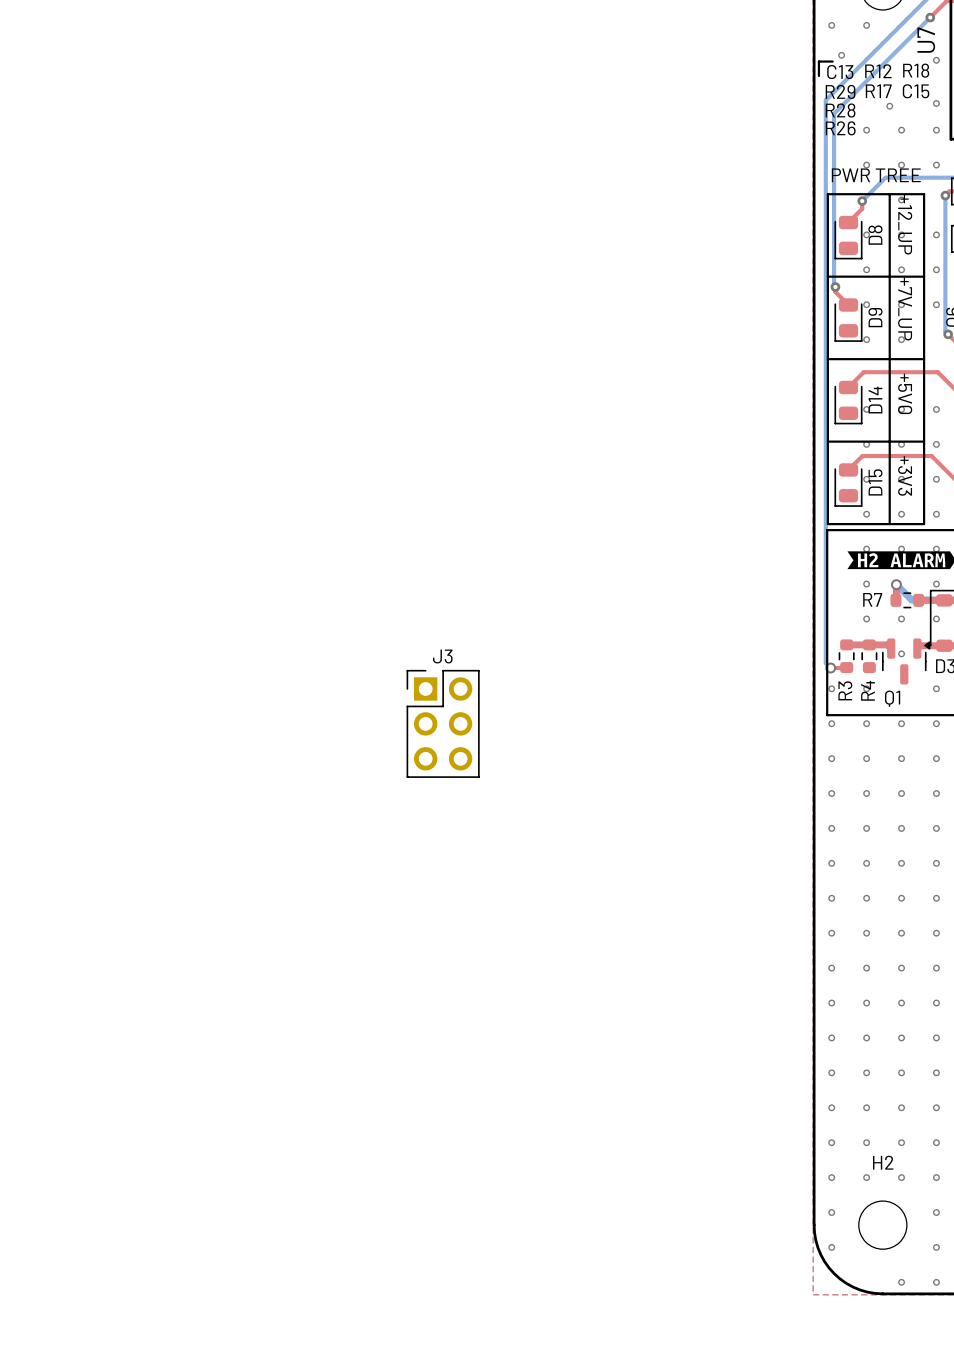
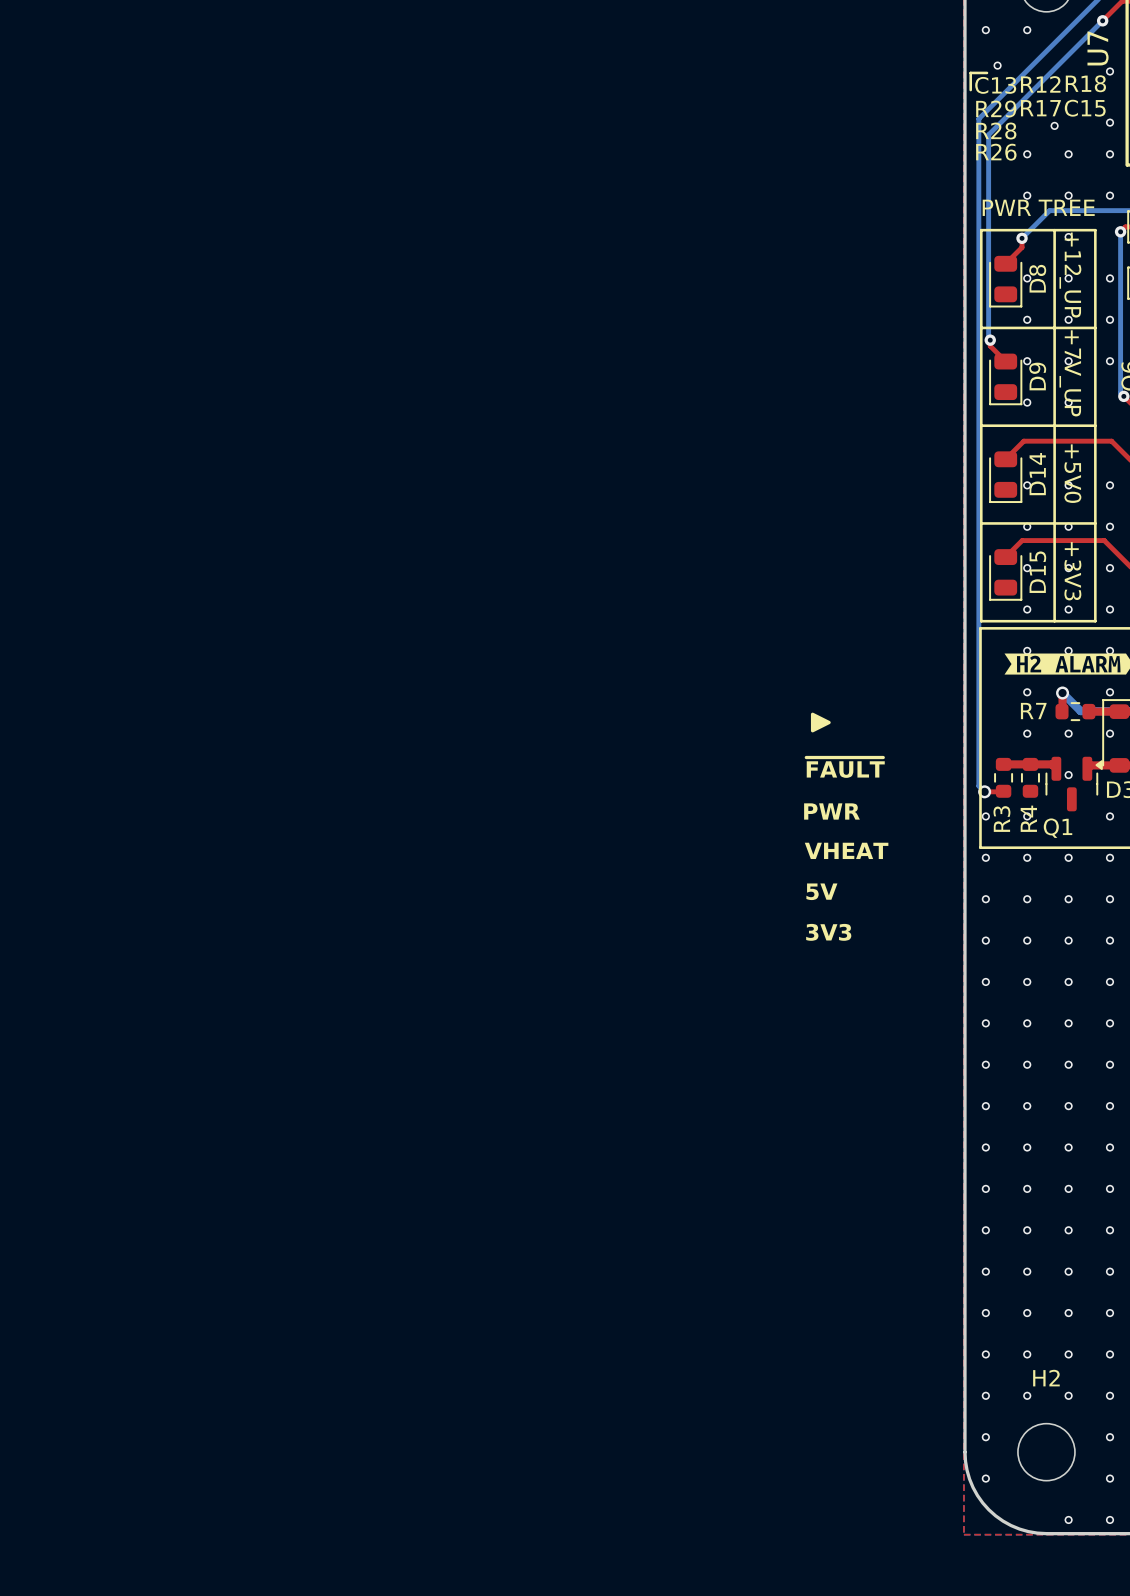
drawing: none -> [810, 712, 831, 733]
text: none -> ~{FAULT} (845, 767)
text: none -> PWR (831, 811)
text: none -> VHEAT (846, 850)
J3: (443, 723) -> none
text: none -> 5V (821, 891)
text: none -> 3V3 (828, 932)

